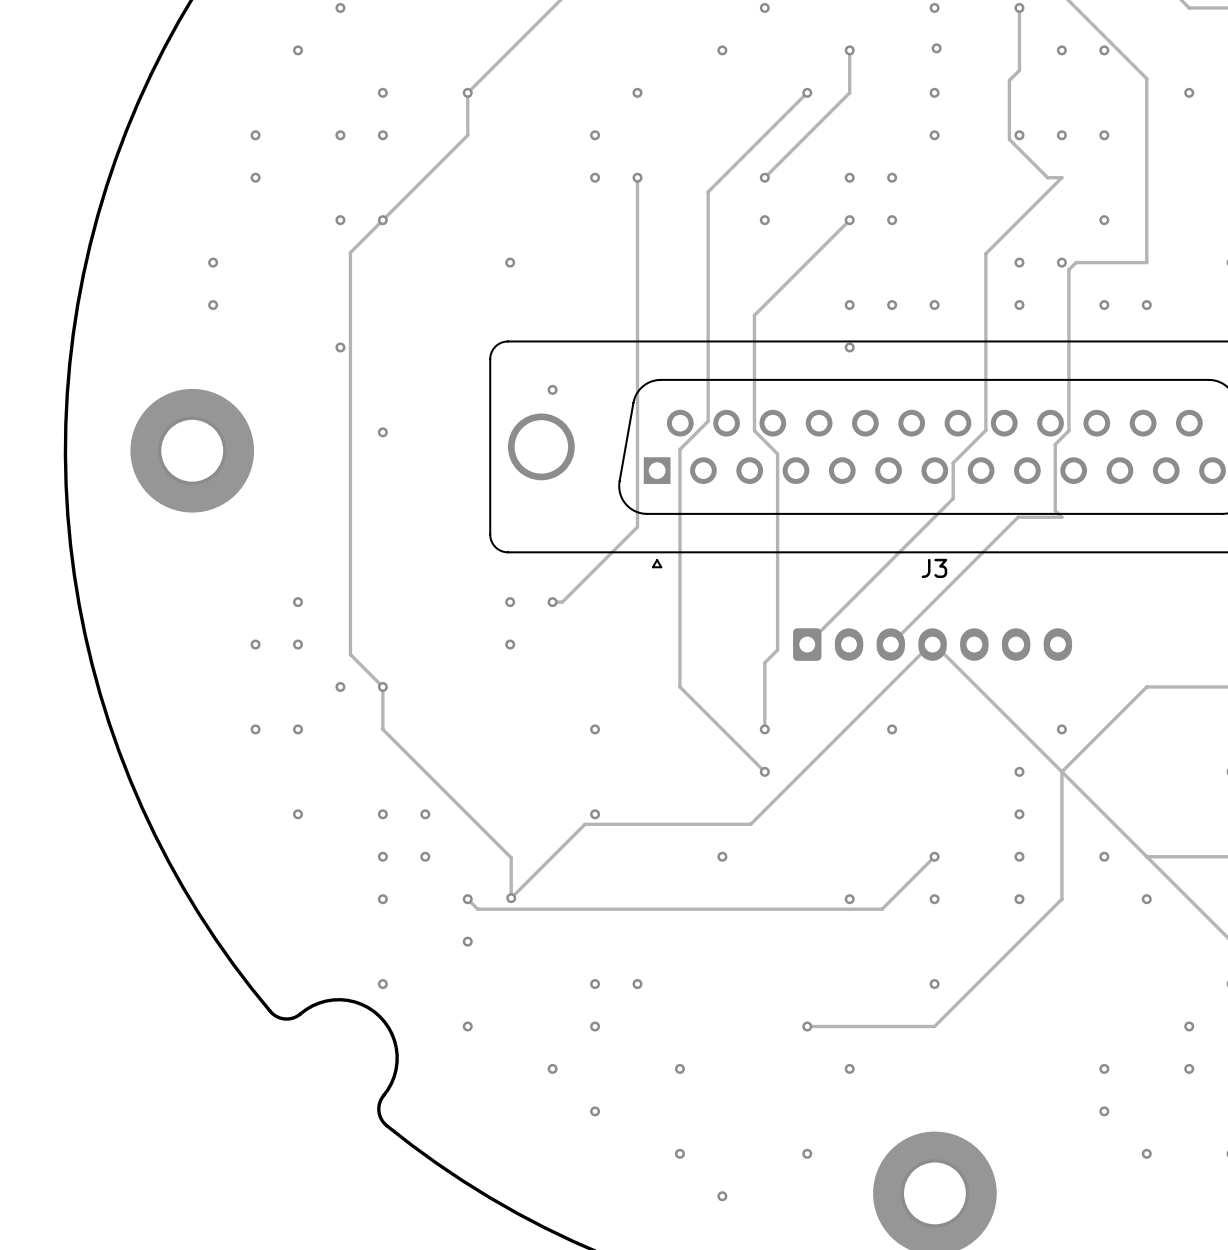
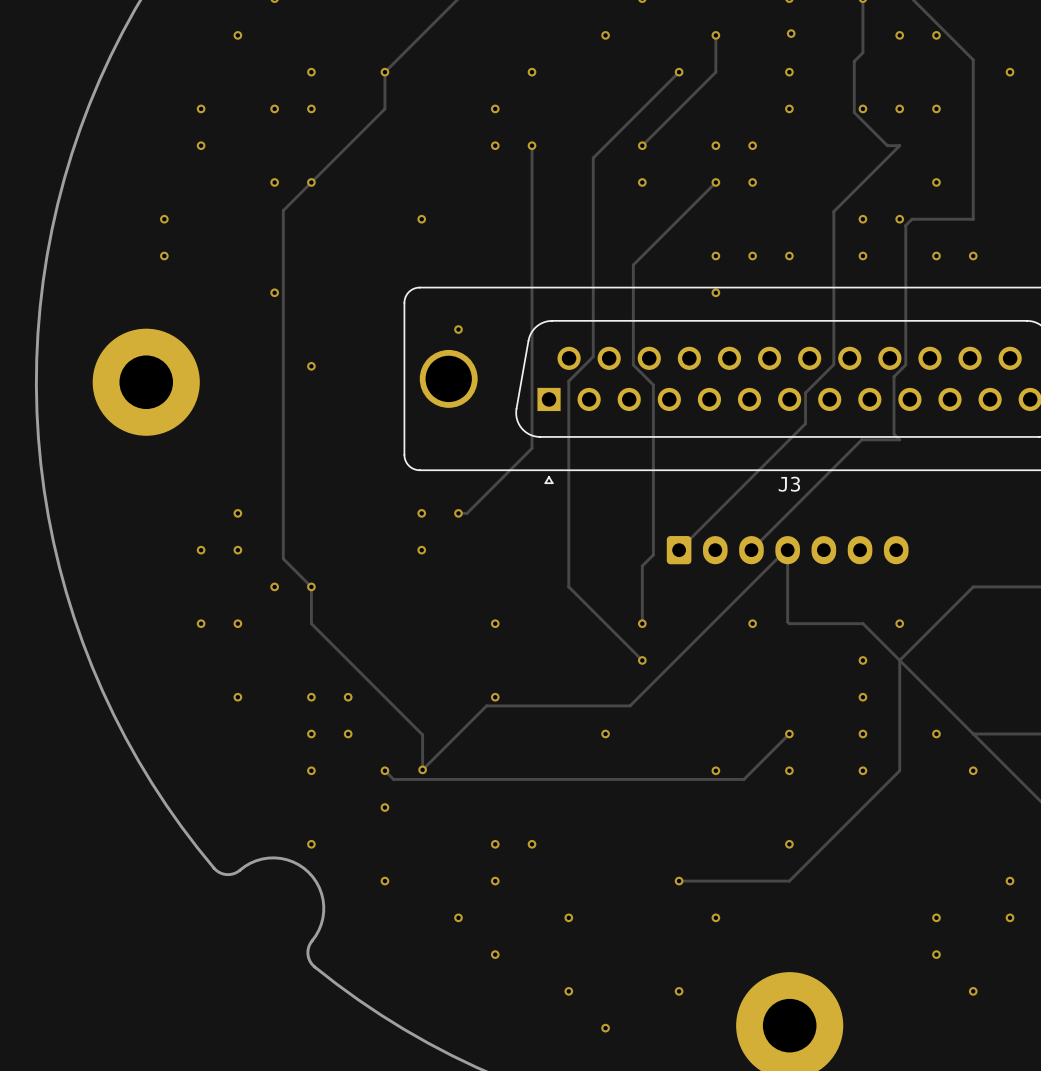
track: (932, 644) (1019, 729) -> (787, 550) (787, 621) (789, 623) (863, 623)

